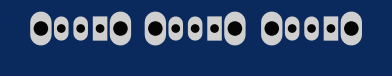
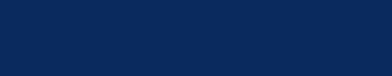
part: (80, 28) -> none
part: (195, 28) -> none
part: (311, 28) -> none

